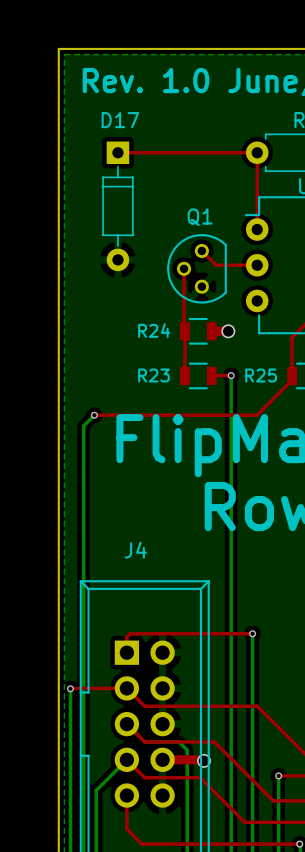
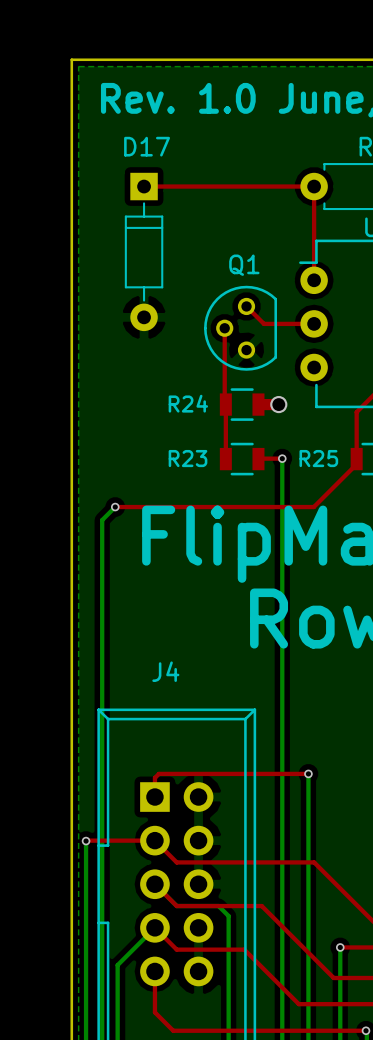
top track: (162, 759) (204, 760) -> none
via: (204, 760) -> none

